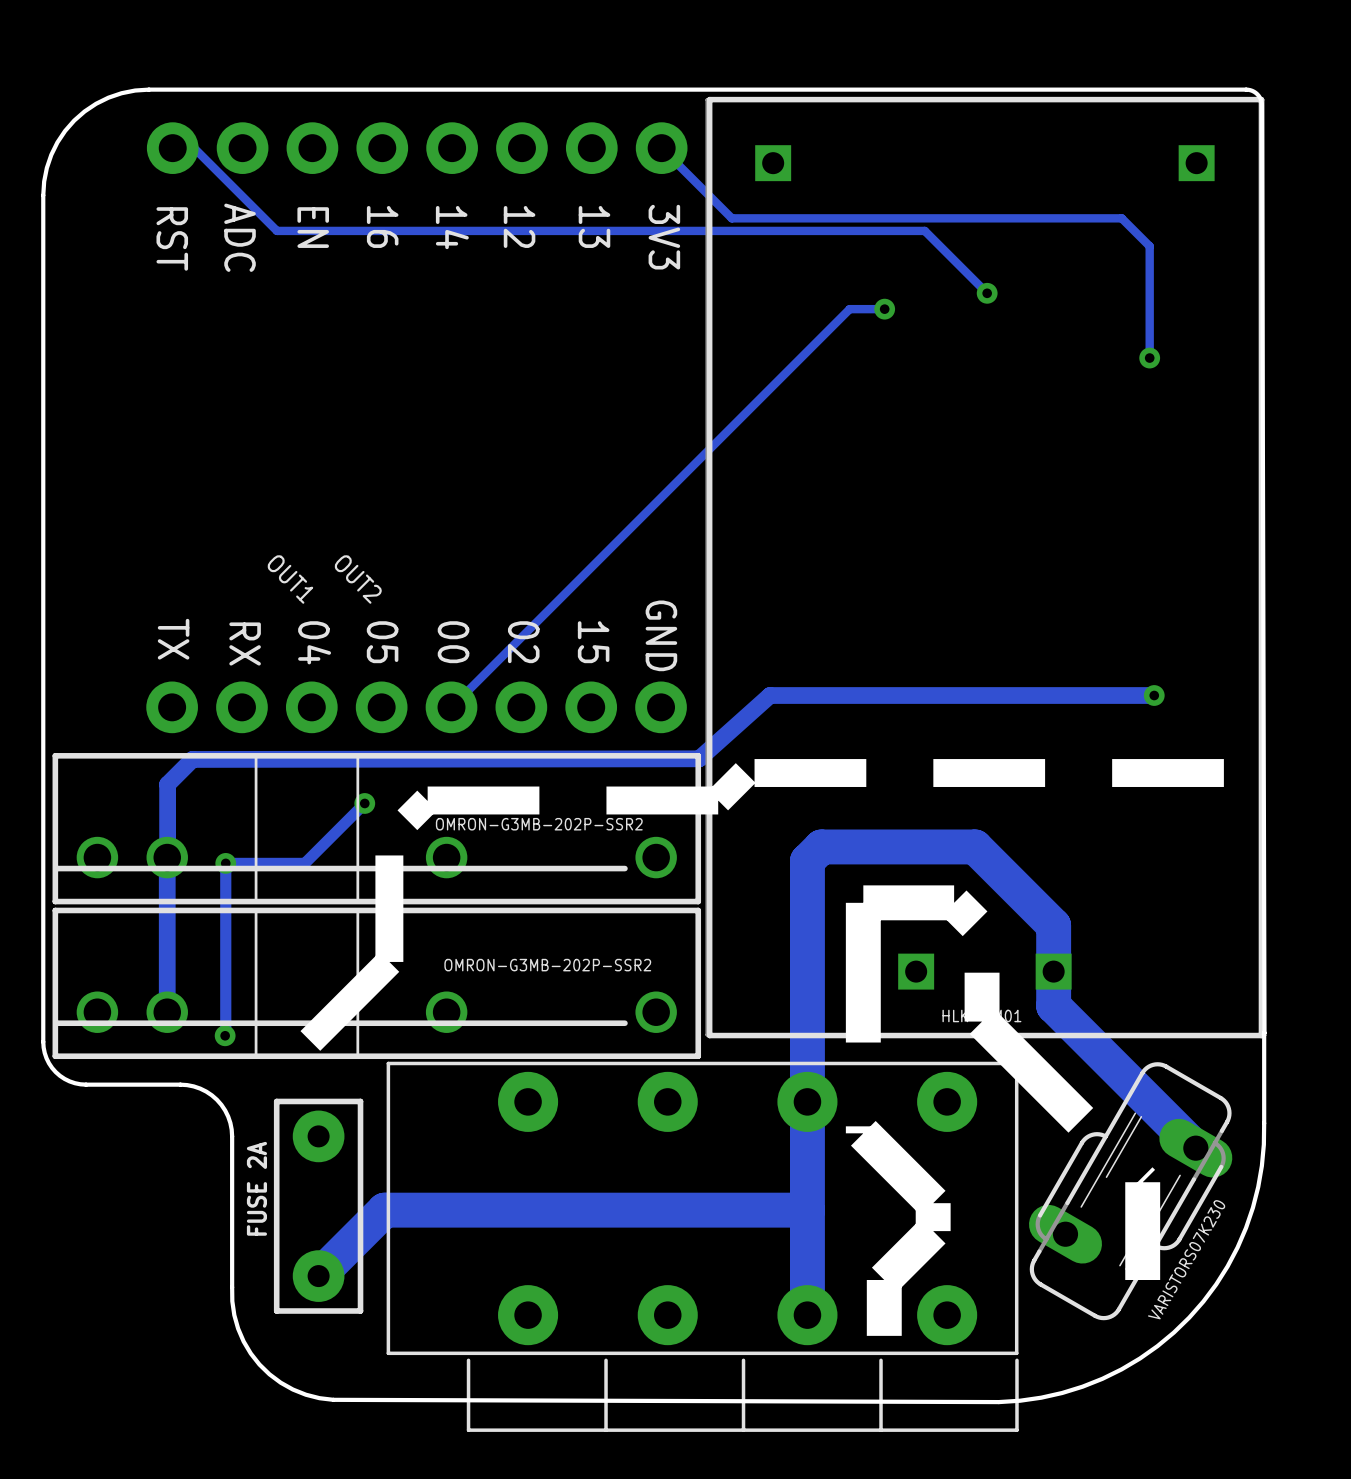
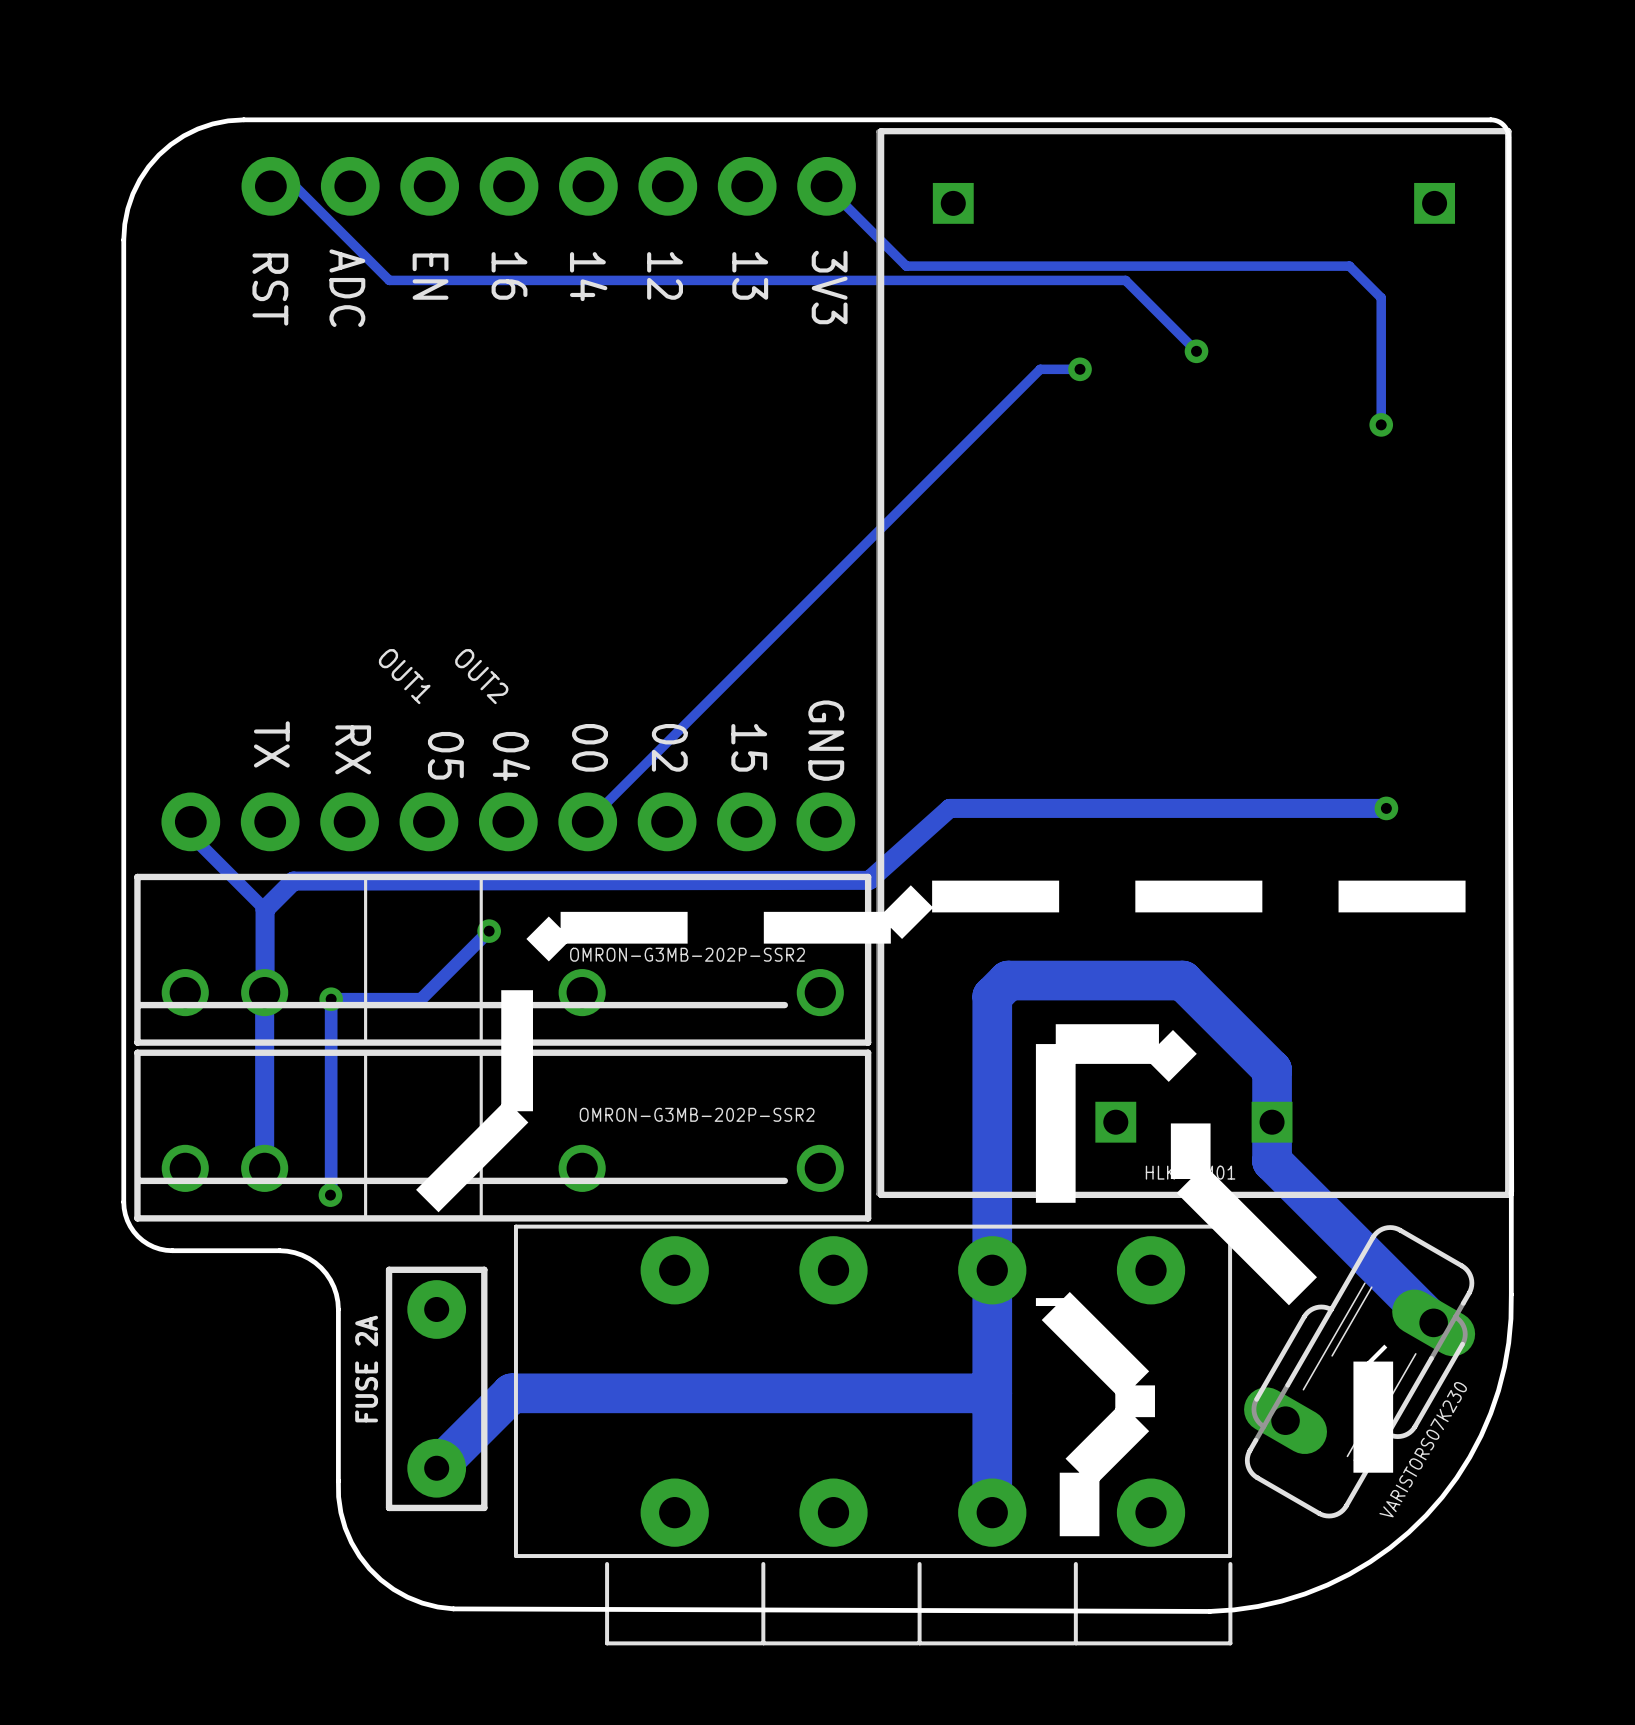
text: 04 (314, 642) -> 05 (445, 755)
text: 05 (382, 642) -> 04 (511, 756)
track: none -> (190, 821) (190, 835) (265, 909)
part: none -> (508, 821)

